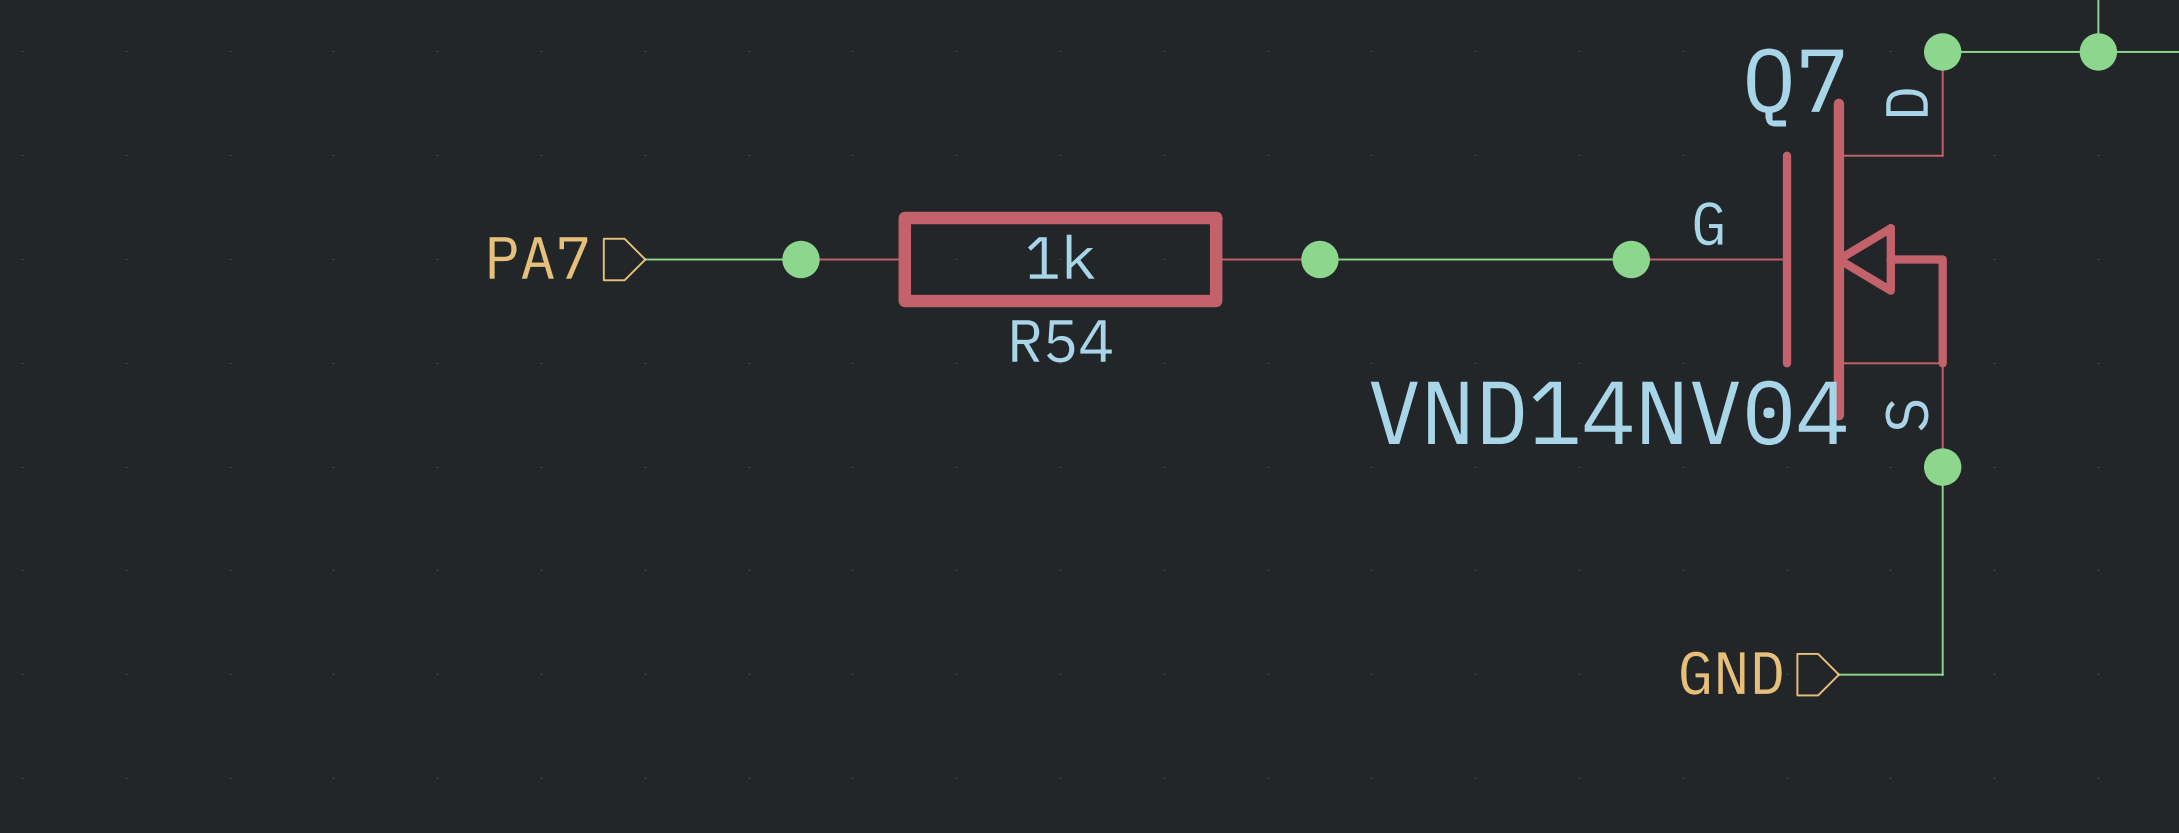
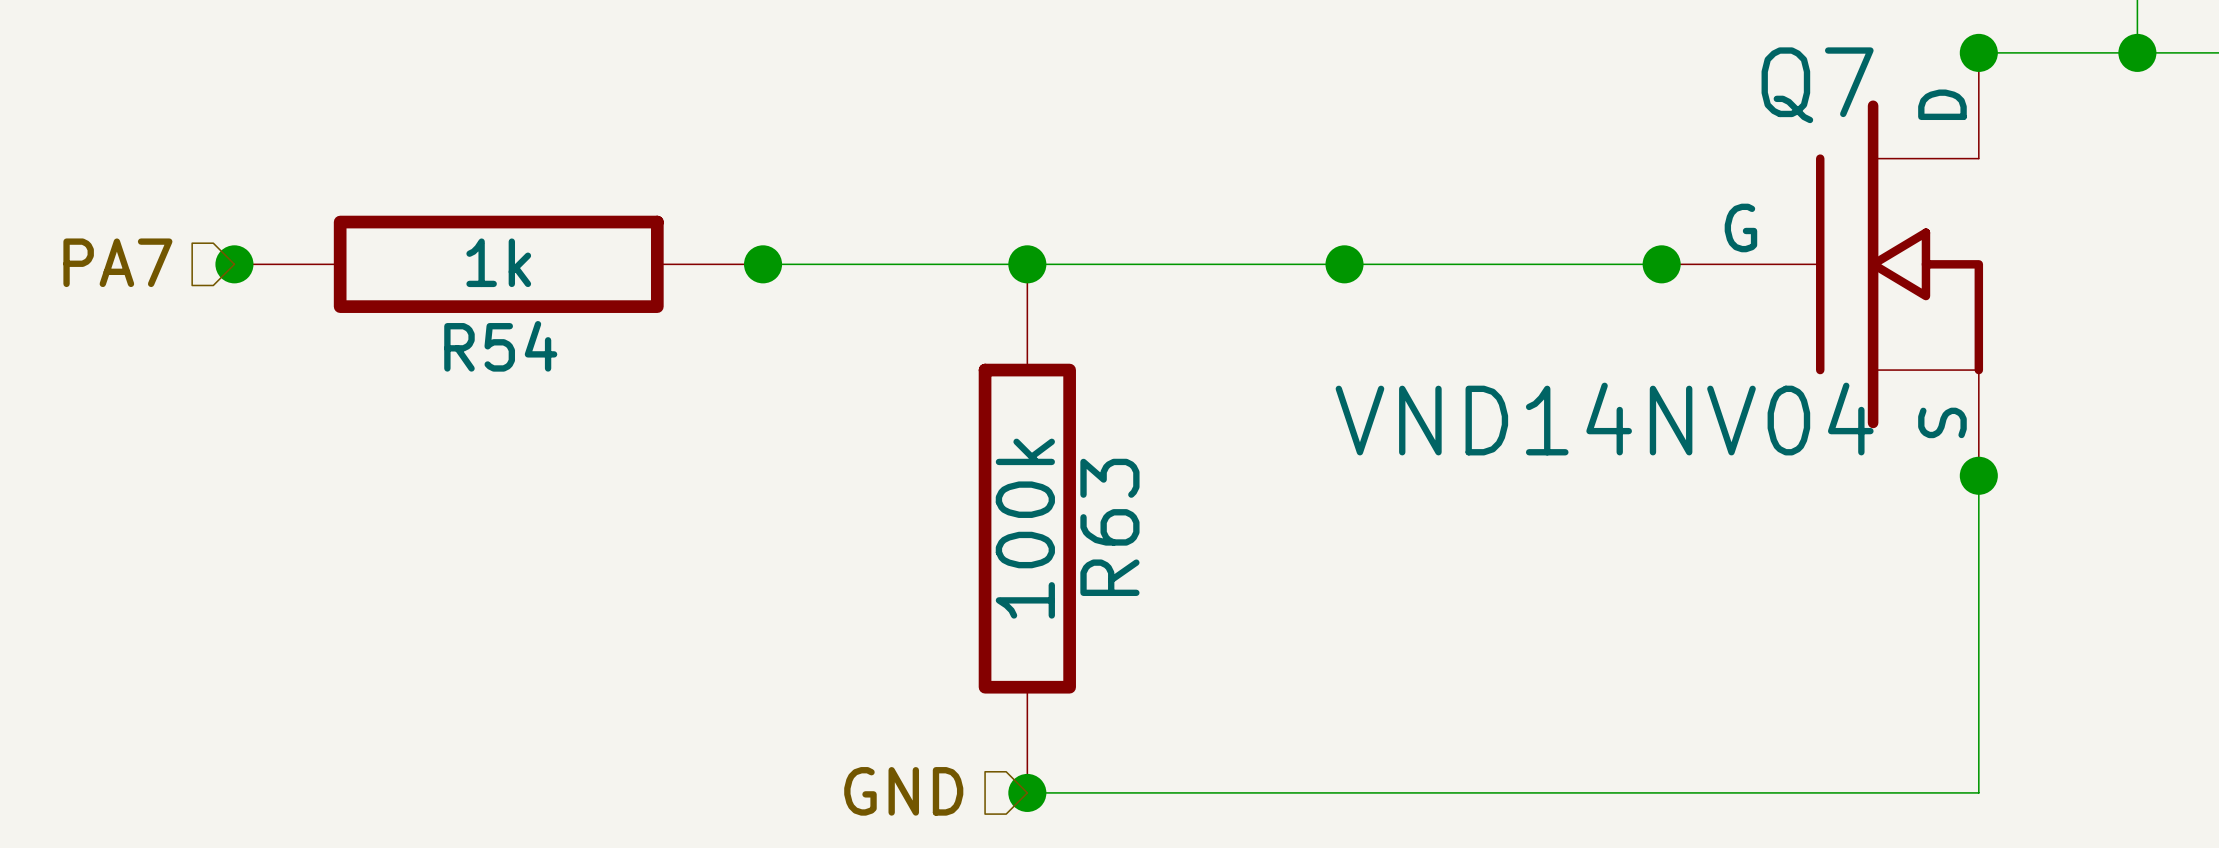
hierarchical label position: PA7 (538, 257) -> PA7 (117, 262)
junction: none -> (234, 264)
wire: none -> (815, 264) (1344, 264)
junction position: (801, 259) -> (763, 264)
junction: none -> (1027, 264)
R54 position: (1060, 259) -> (498, 264)
R63: none -> 100k (1027, 528)
hierarchical label position: GND (1731, 673) -> GND (903, 791)
wire: (1838, 674) (1942, 674) -> (1027, 792) (1978, 792) (1978, 687)
junction: none -> (1027, 792)

